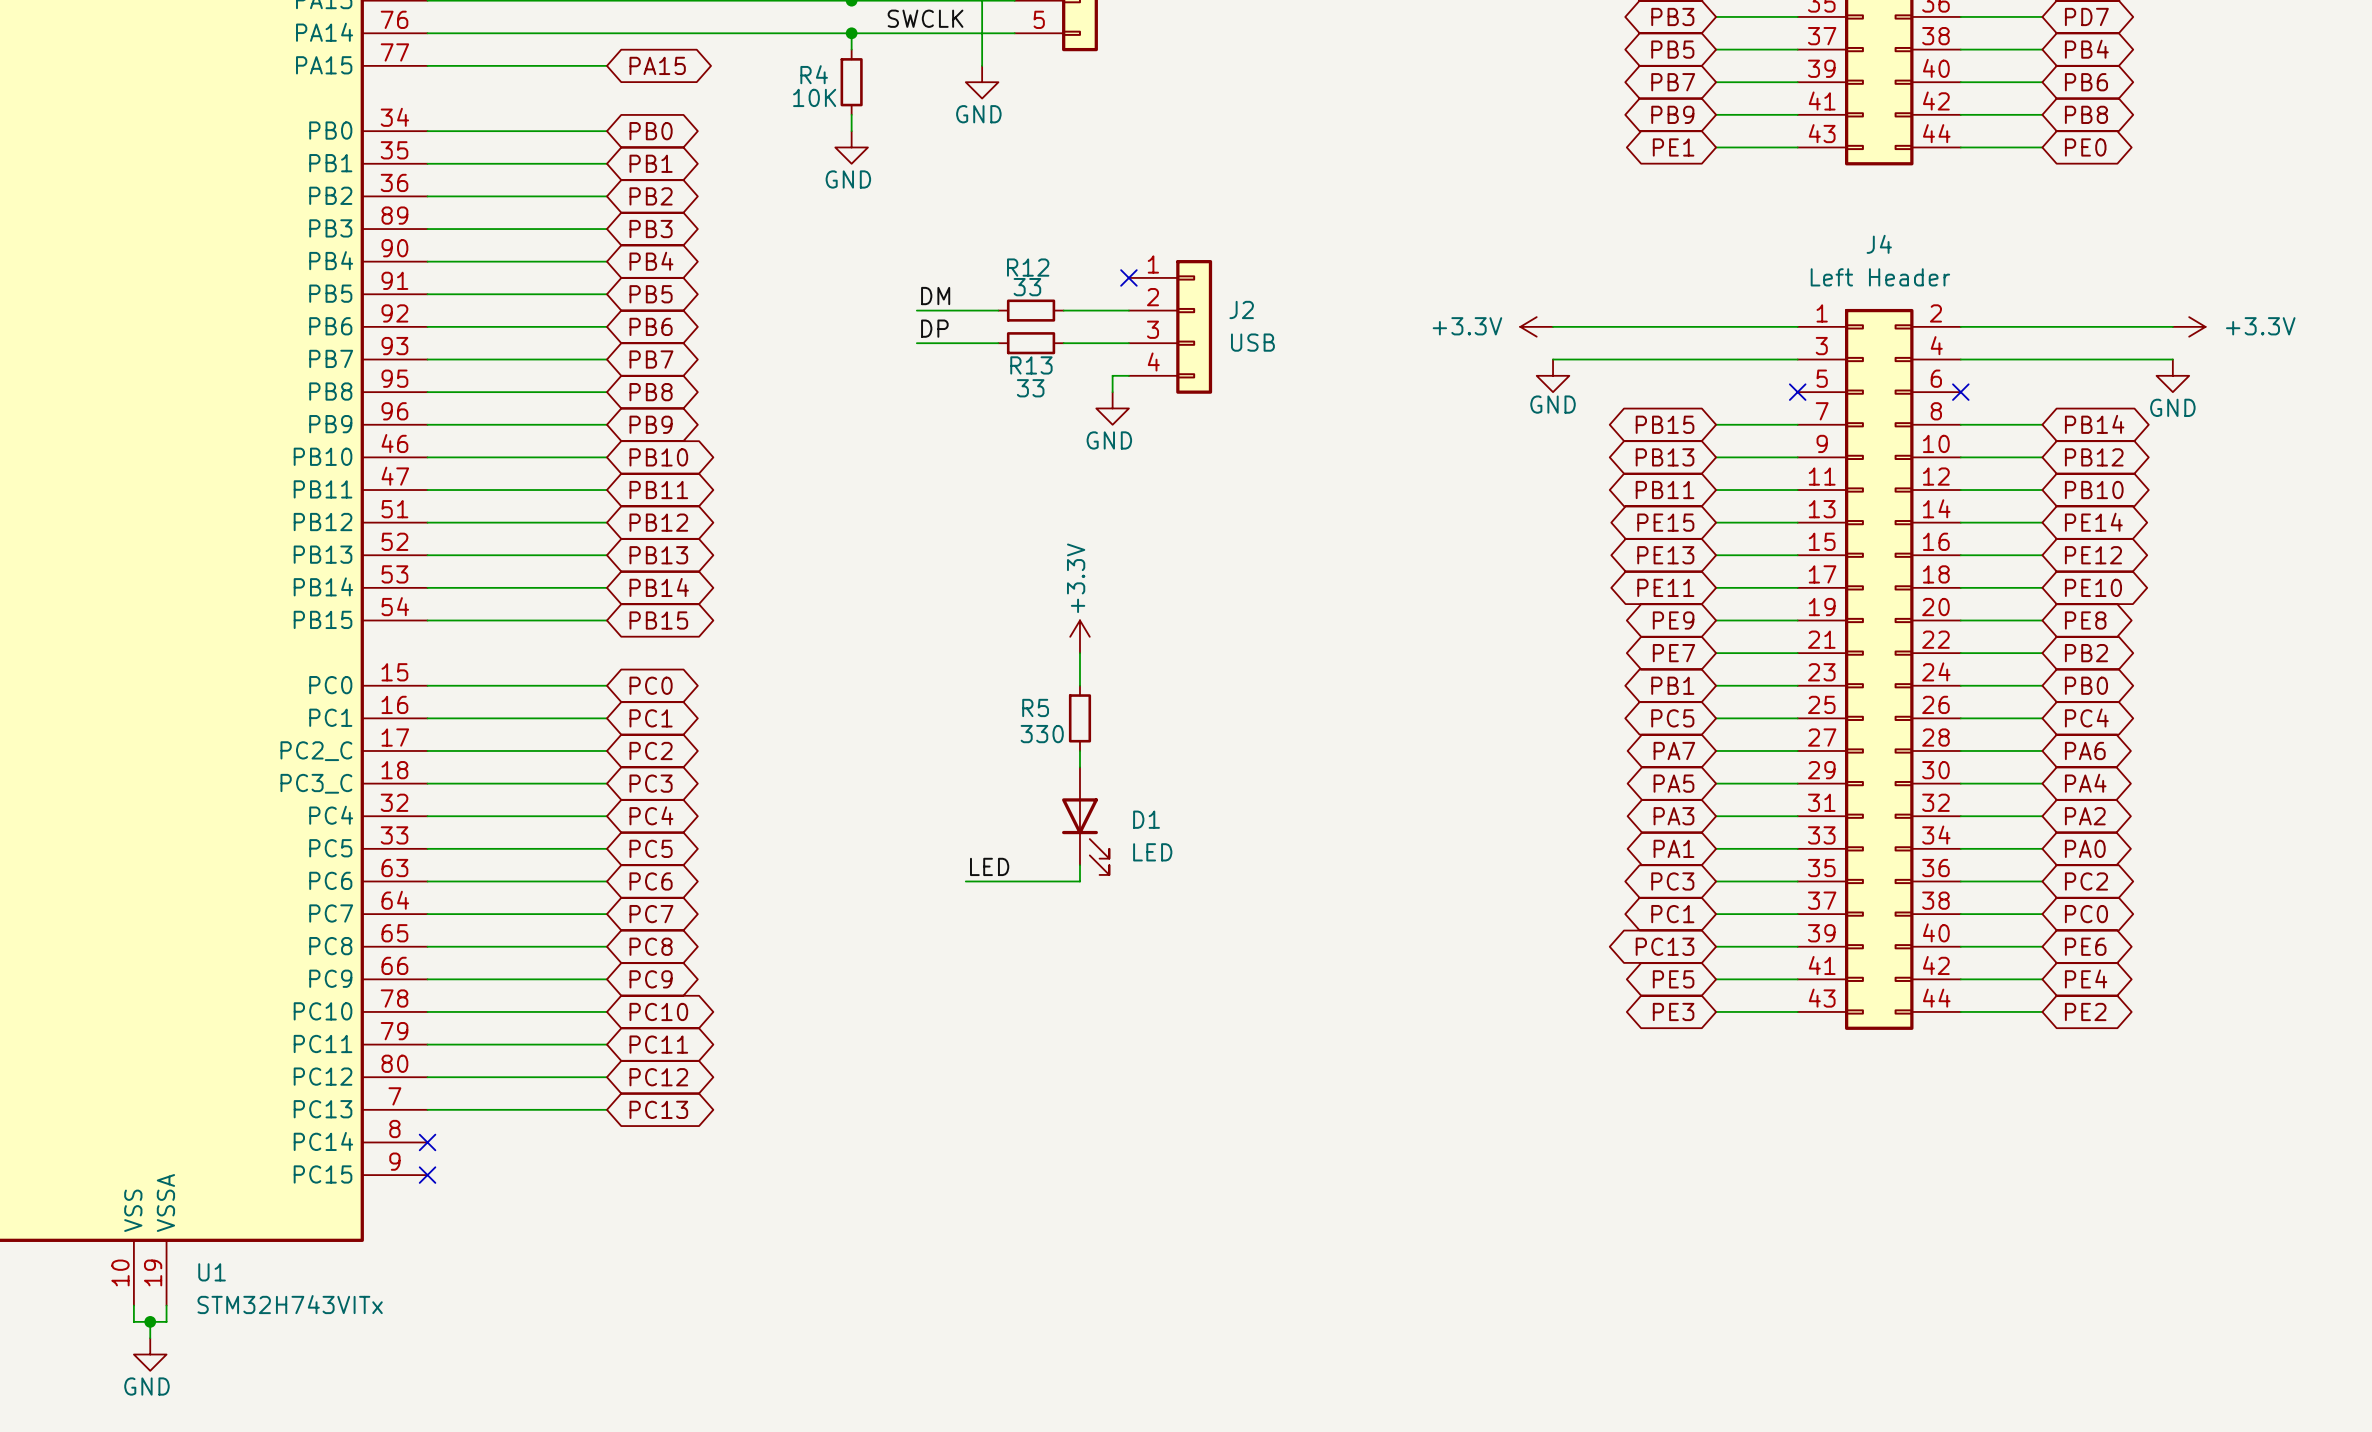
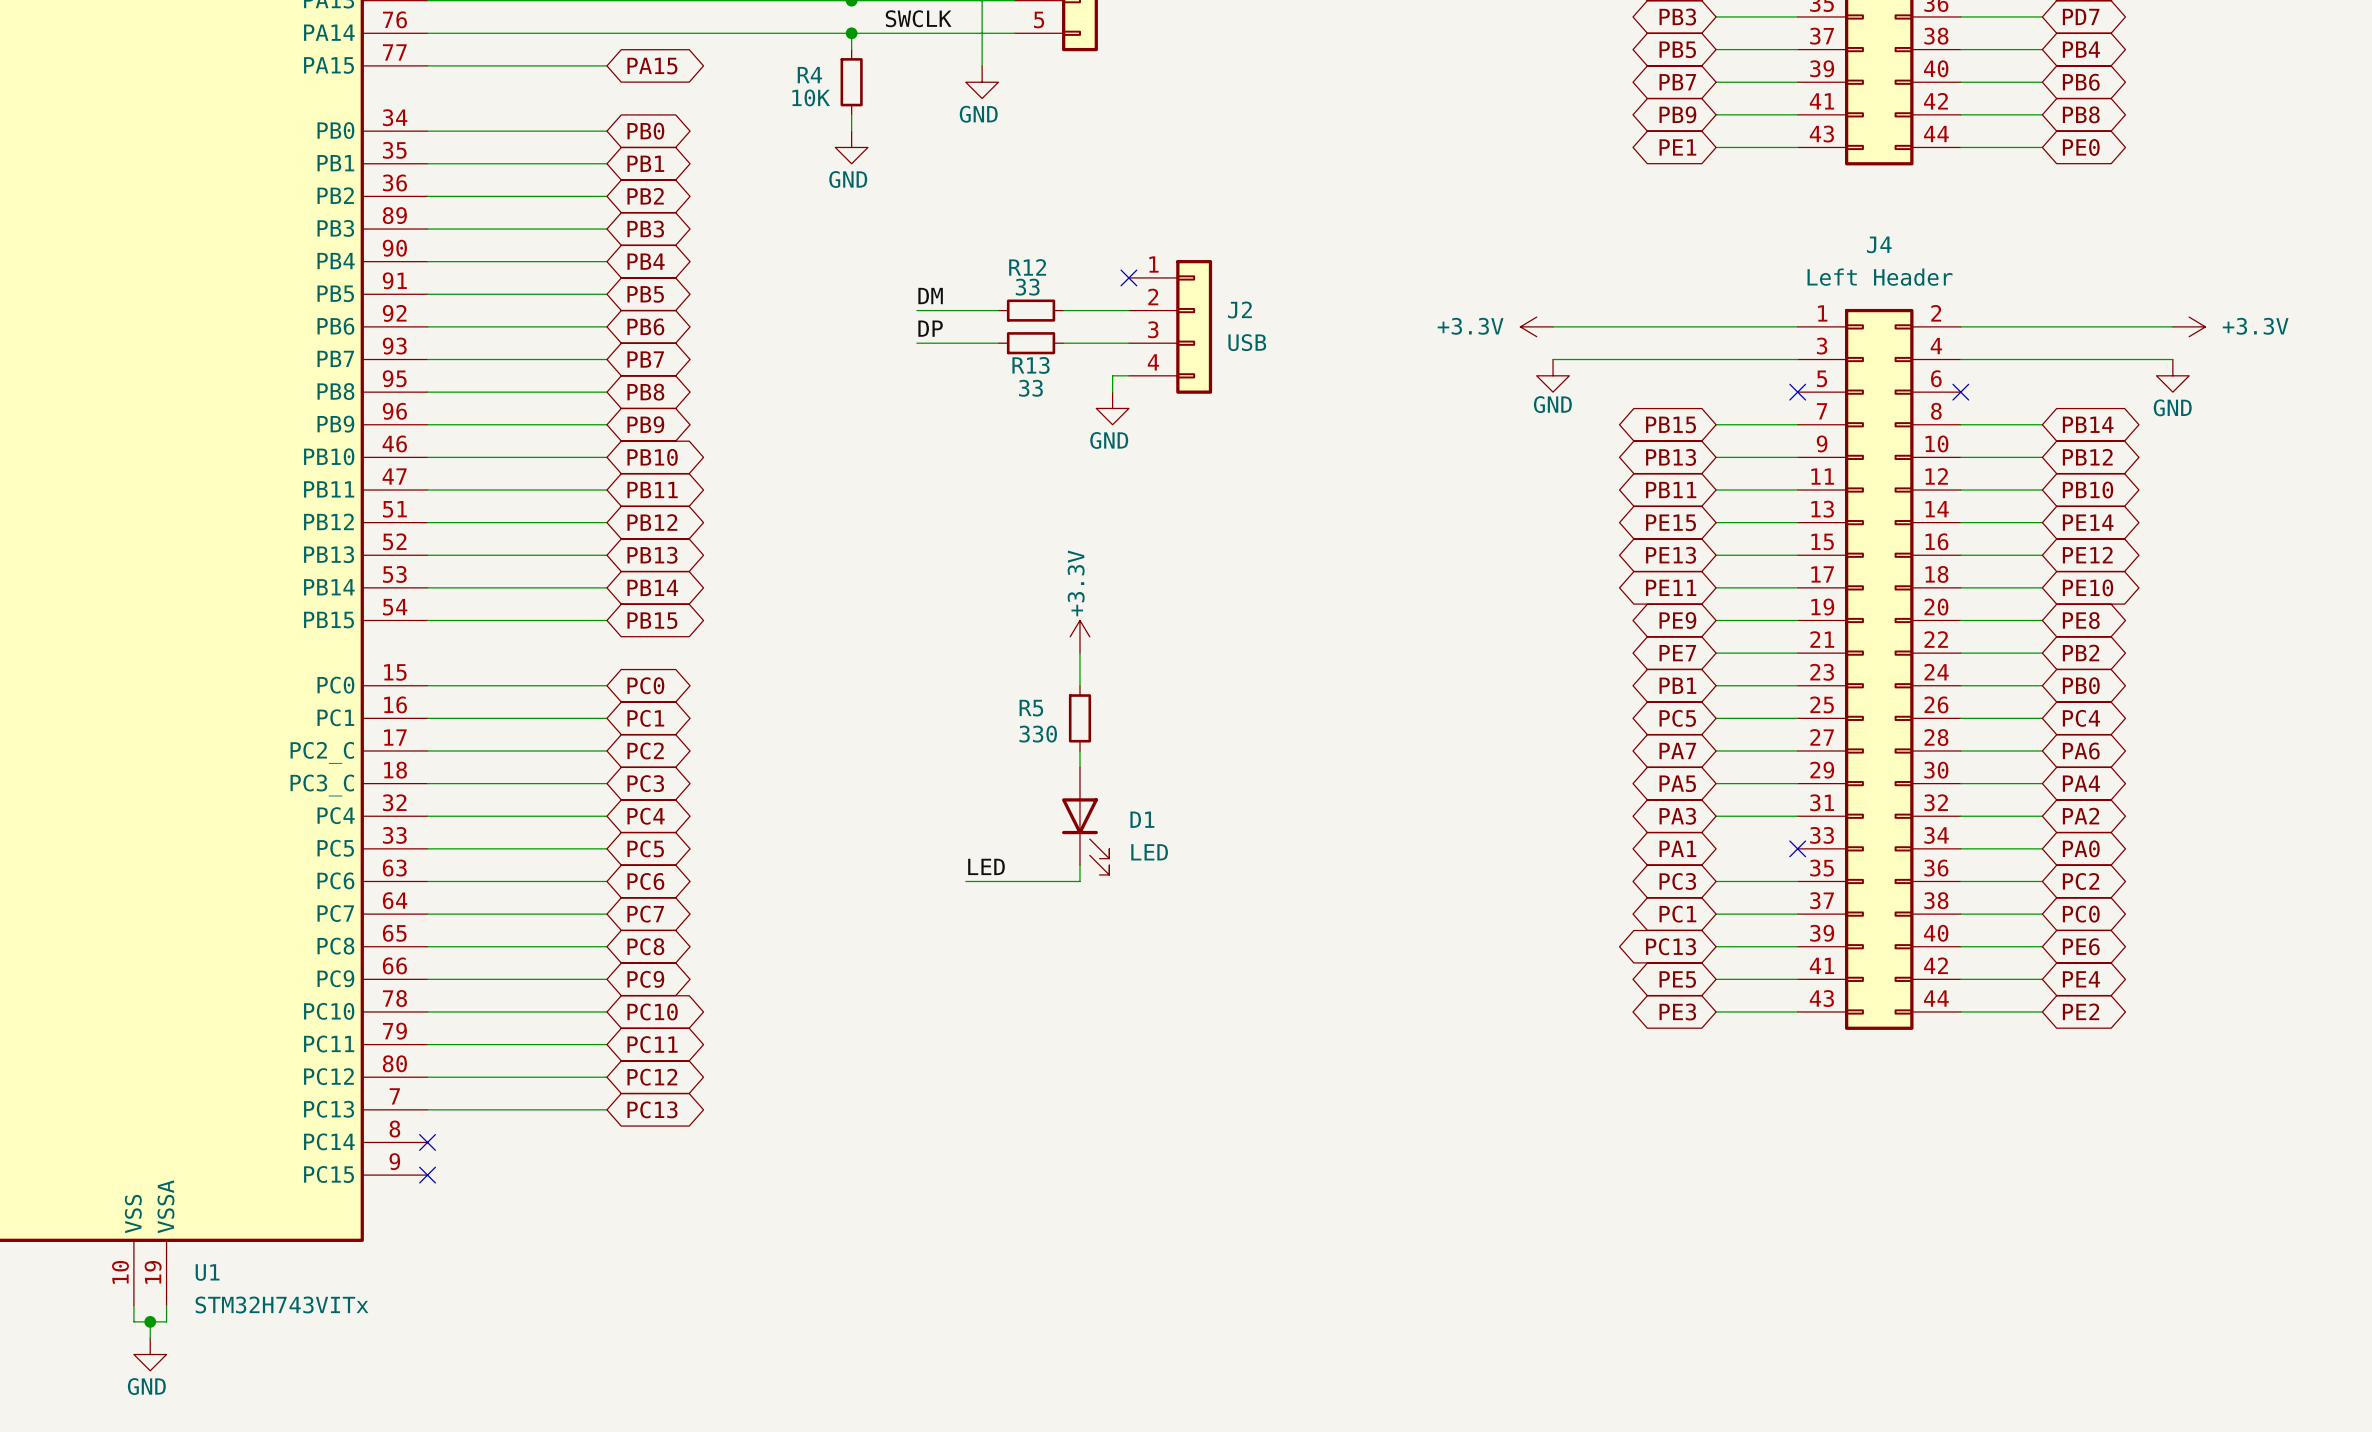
wire: (1716, 848) (1797, 848) -> none
no-connect mark: none -> (1797, 848)

